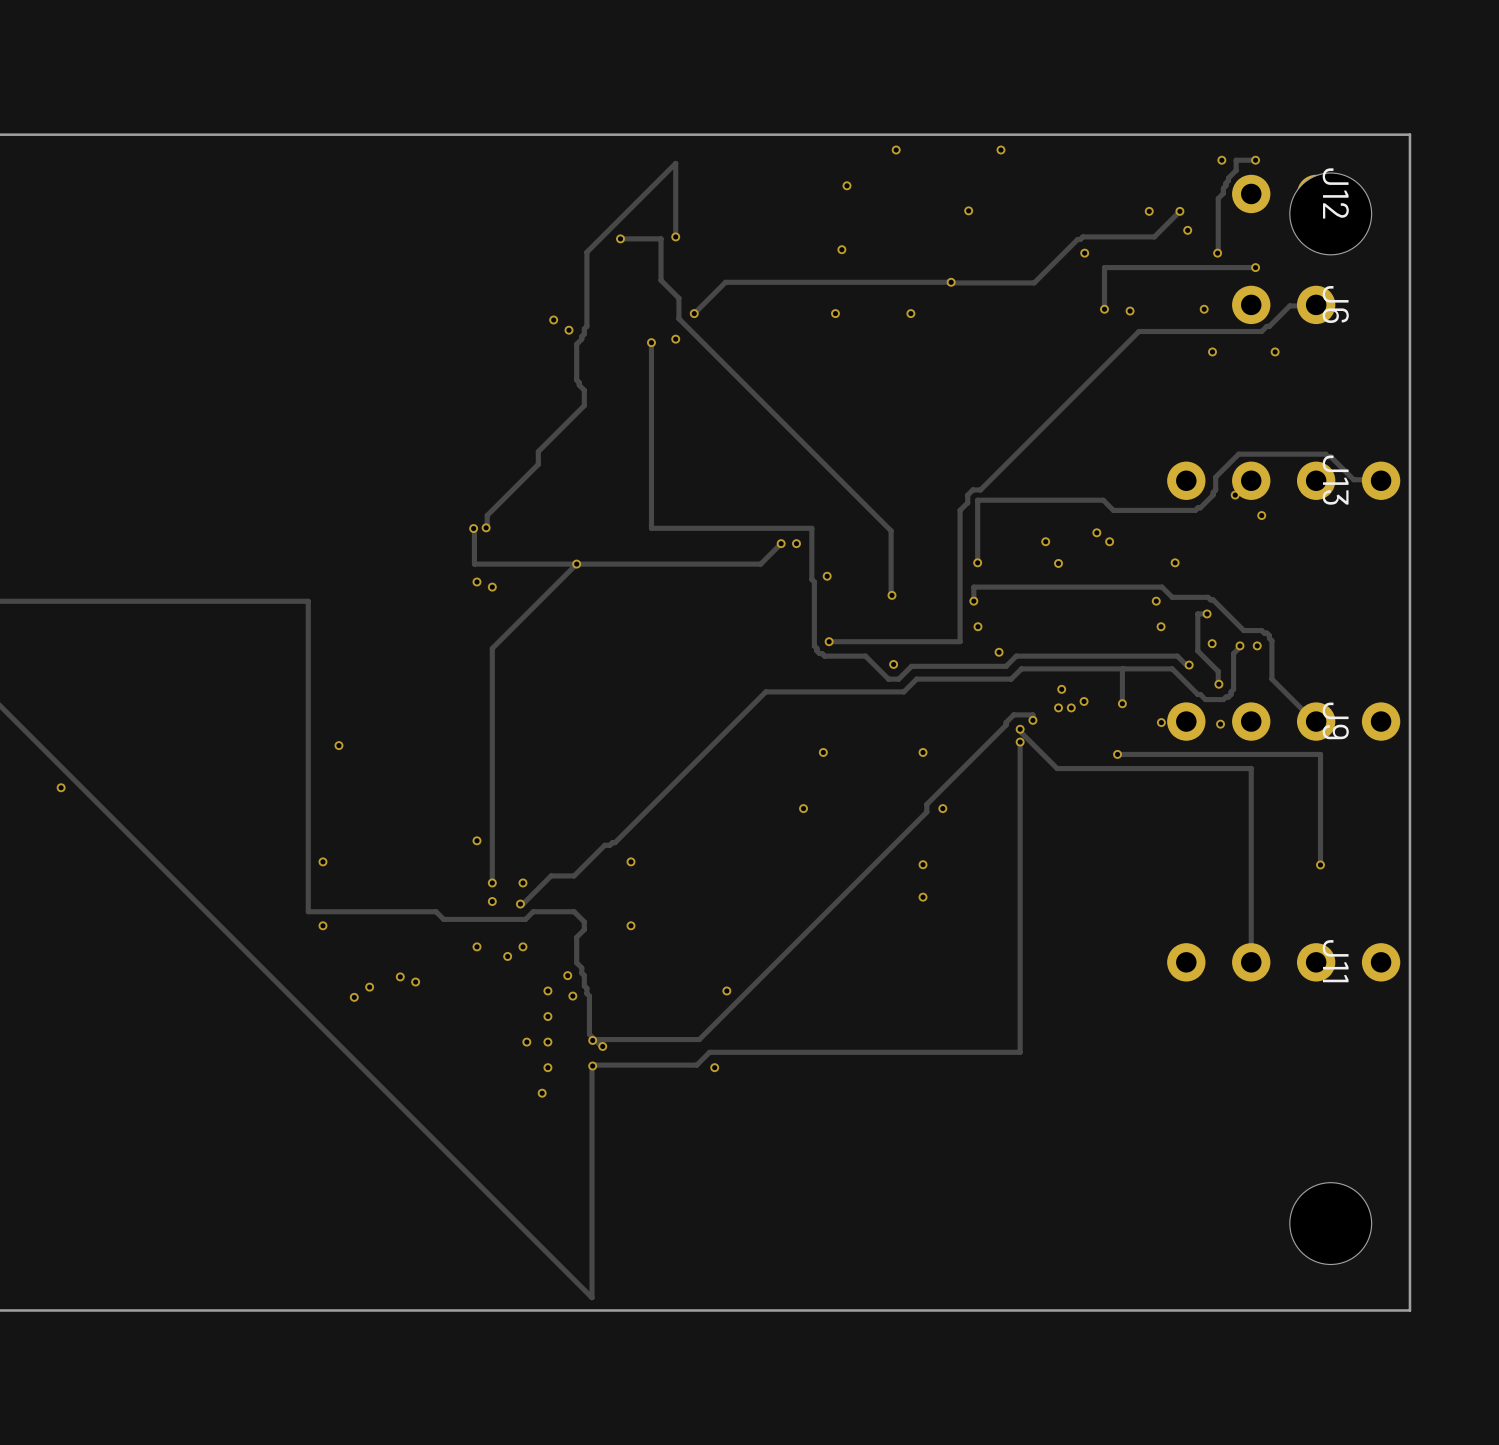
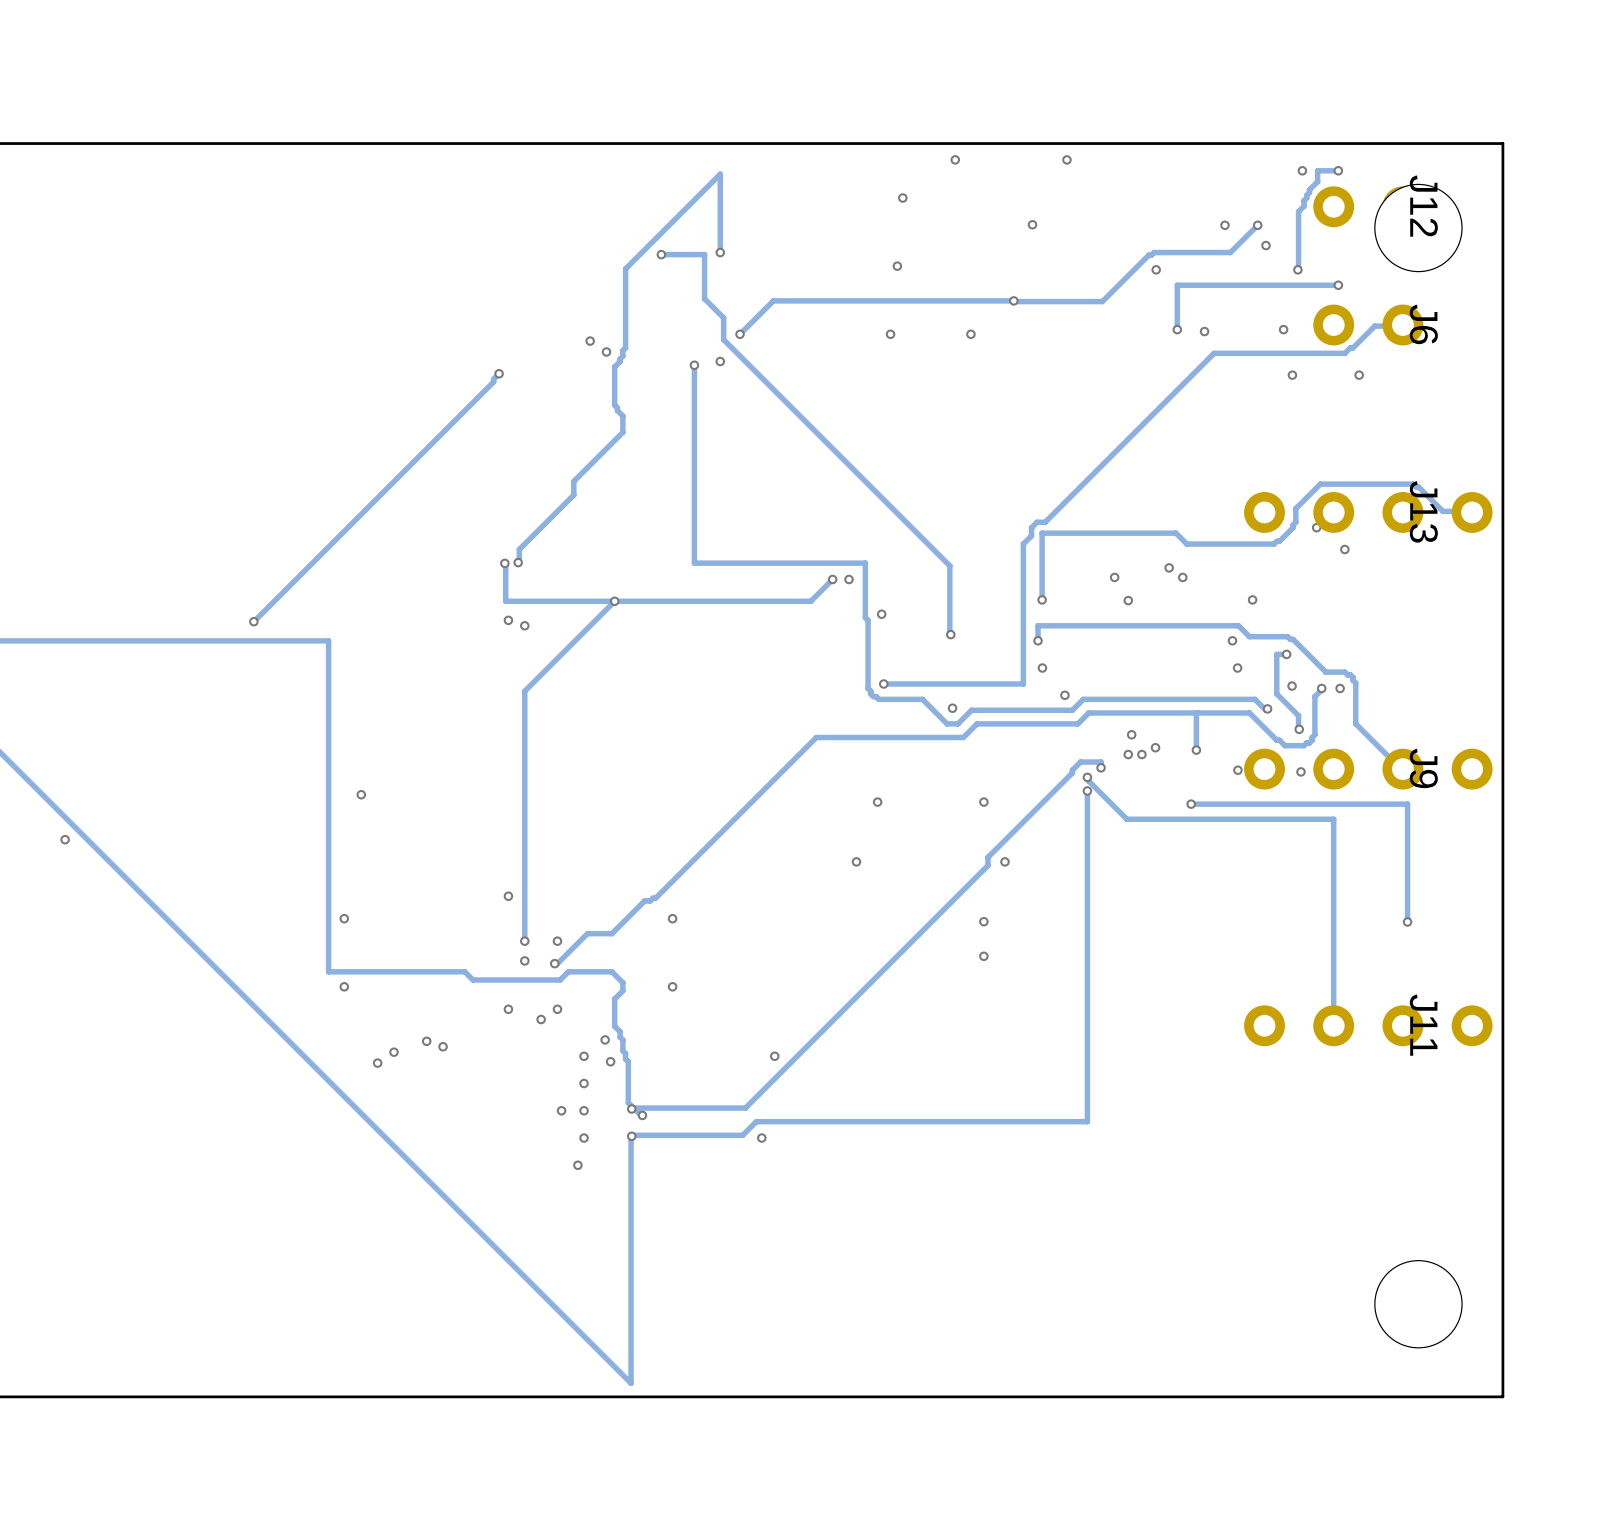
track: none -> (499, 373) (493, 379) (493, 381) (253, 621)
via: none -> (499, 373)
via: none -> (253, 621)

